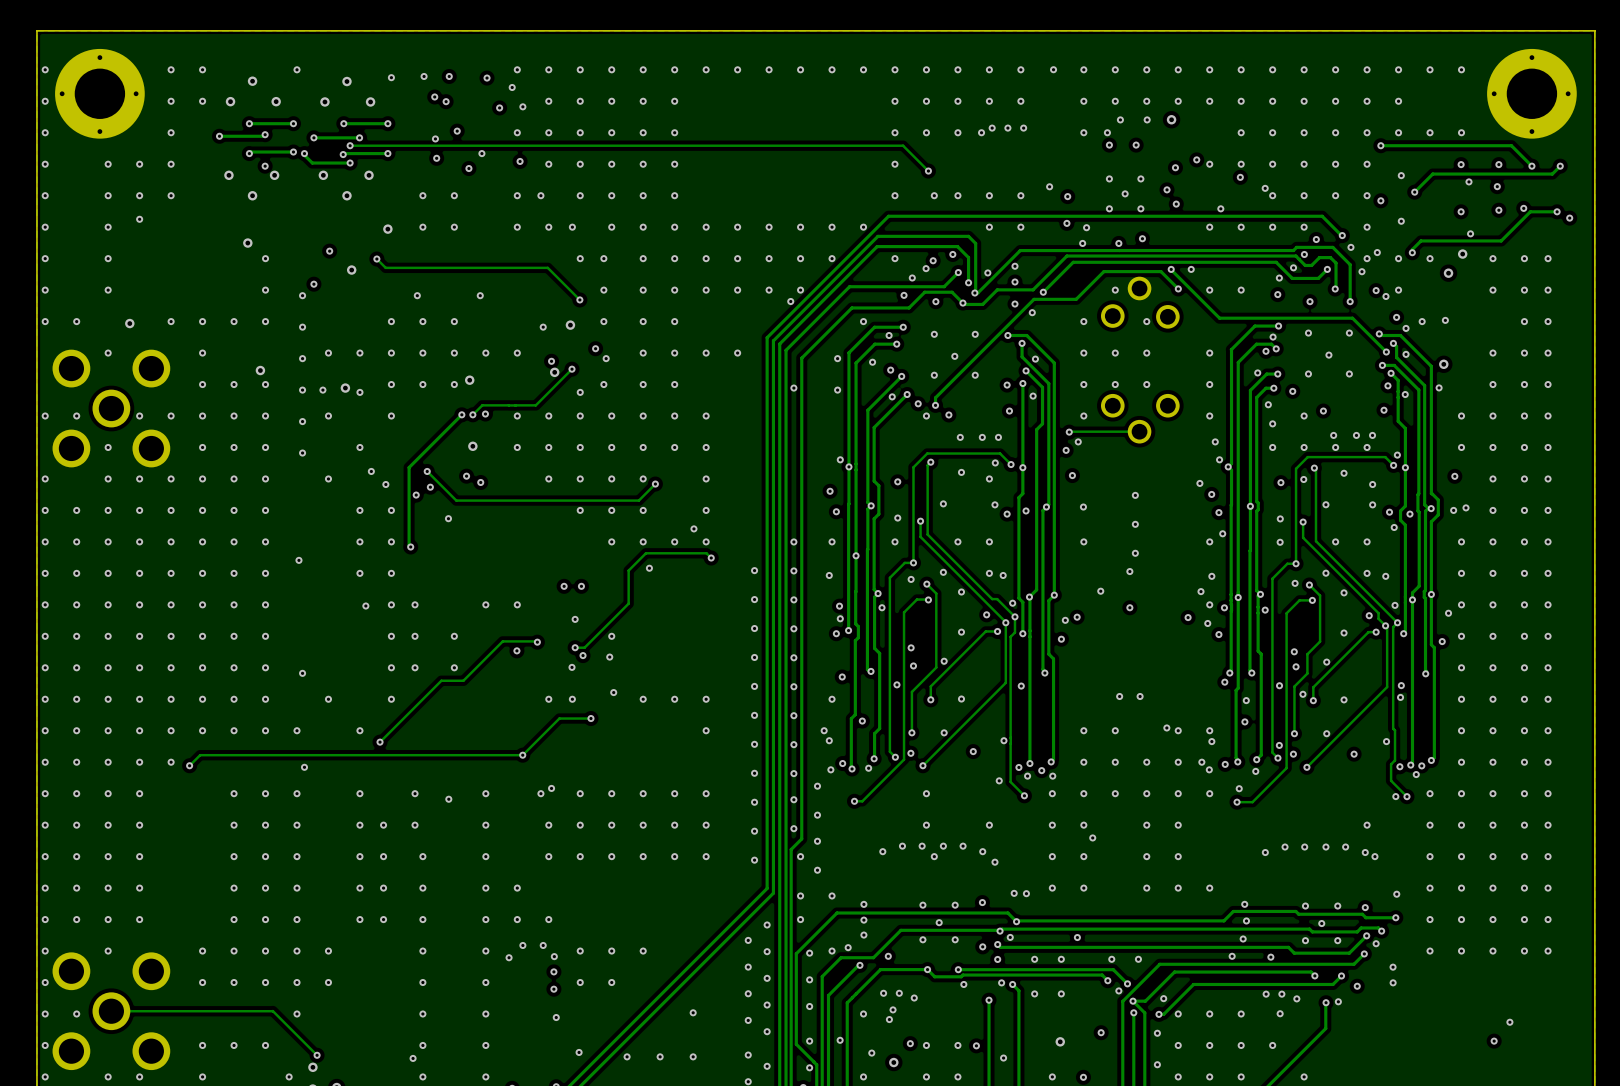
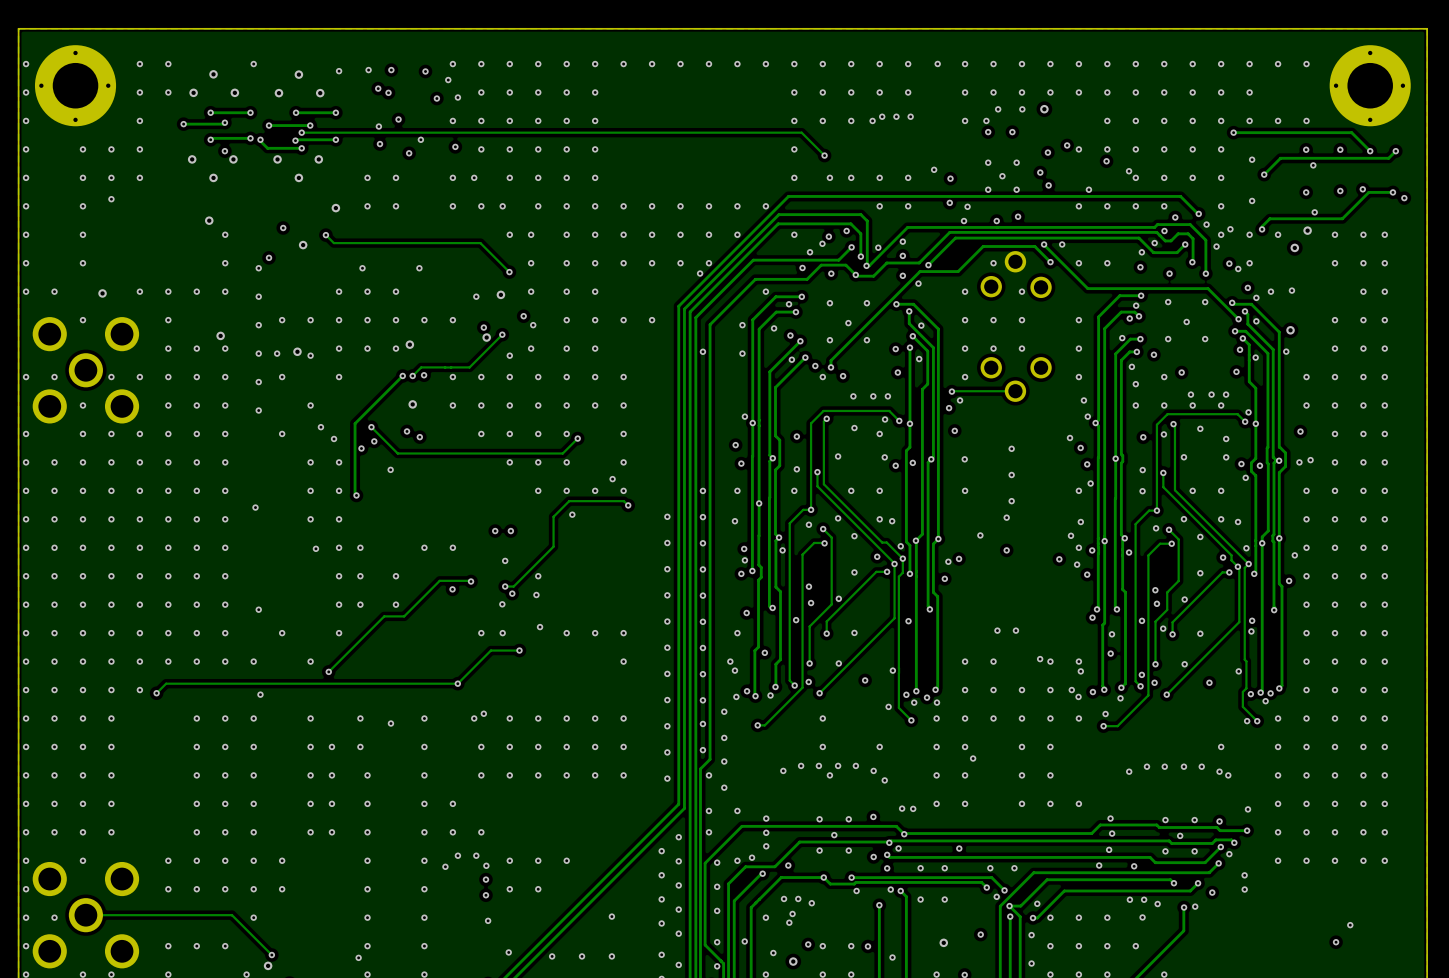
via: (1497, 186) -> none
via: (1380, 200) -> none

